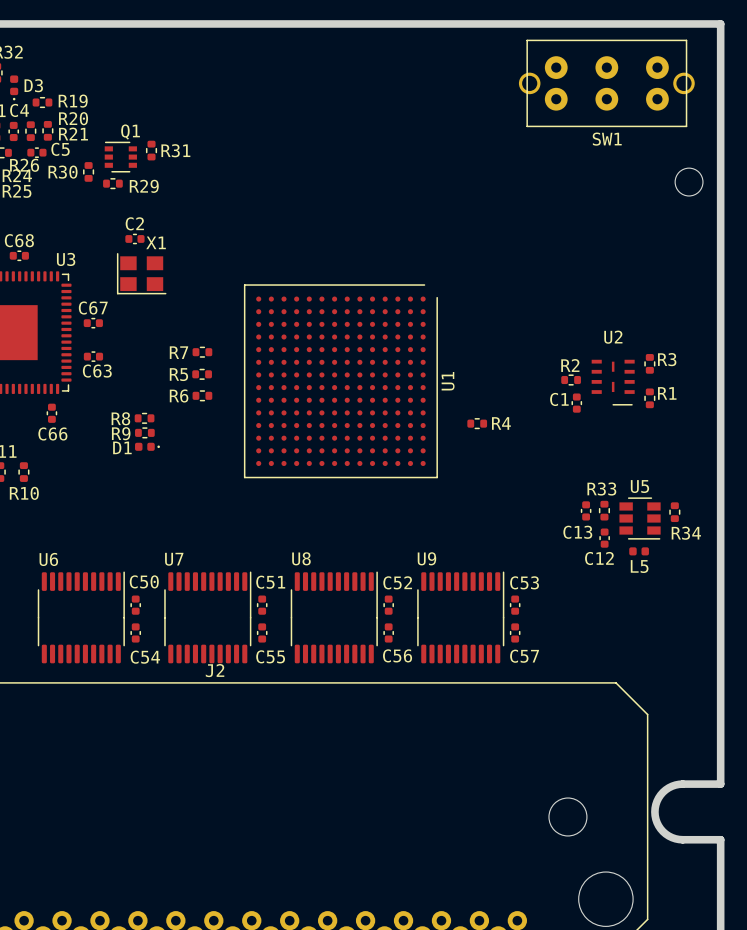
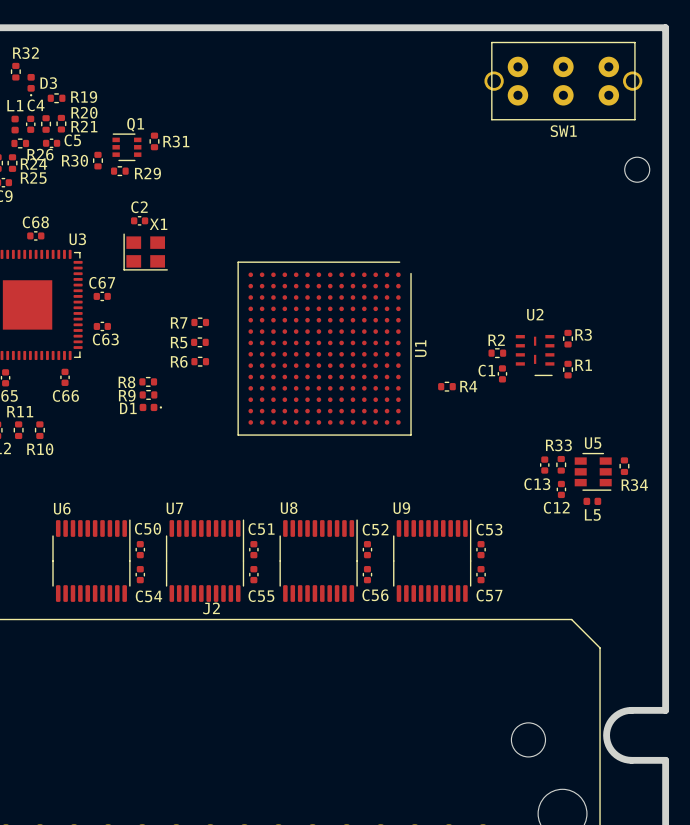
R3 position: (649, 363) -> (568, 338)
R2 position: (571, 380) -> (497, 353)
U2 position: (613, 382) -> (535, 355)
R1 position: (649, 398) -> (568, 369)
C1 position: (576, 403) -> (502, 373)

